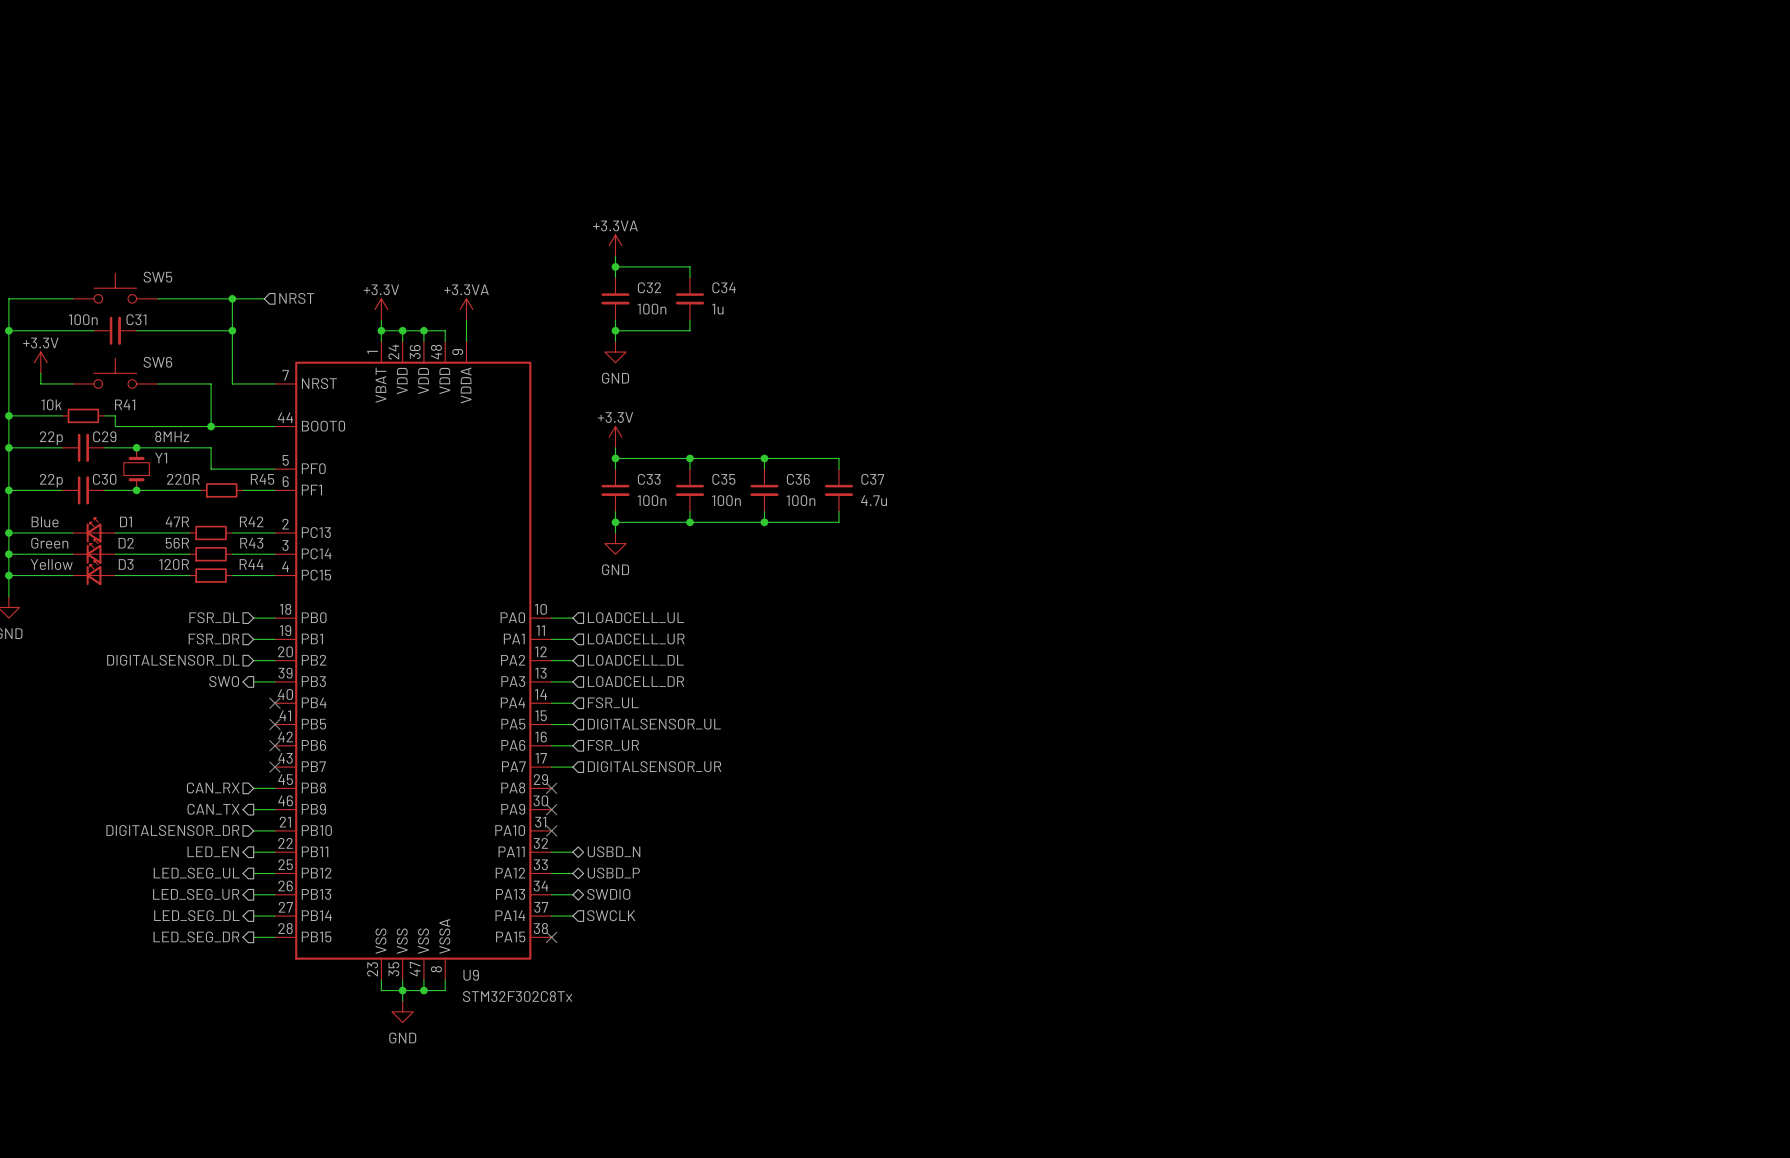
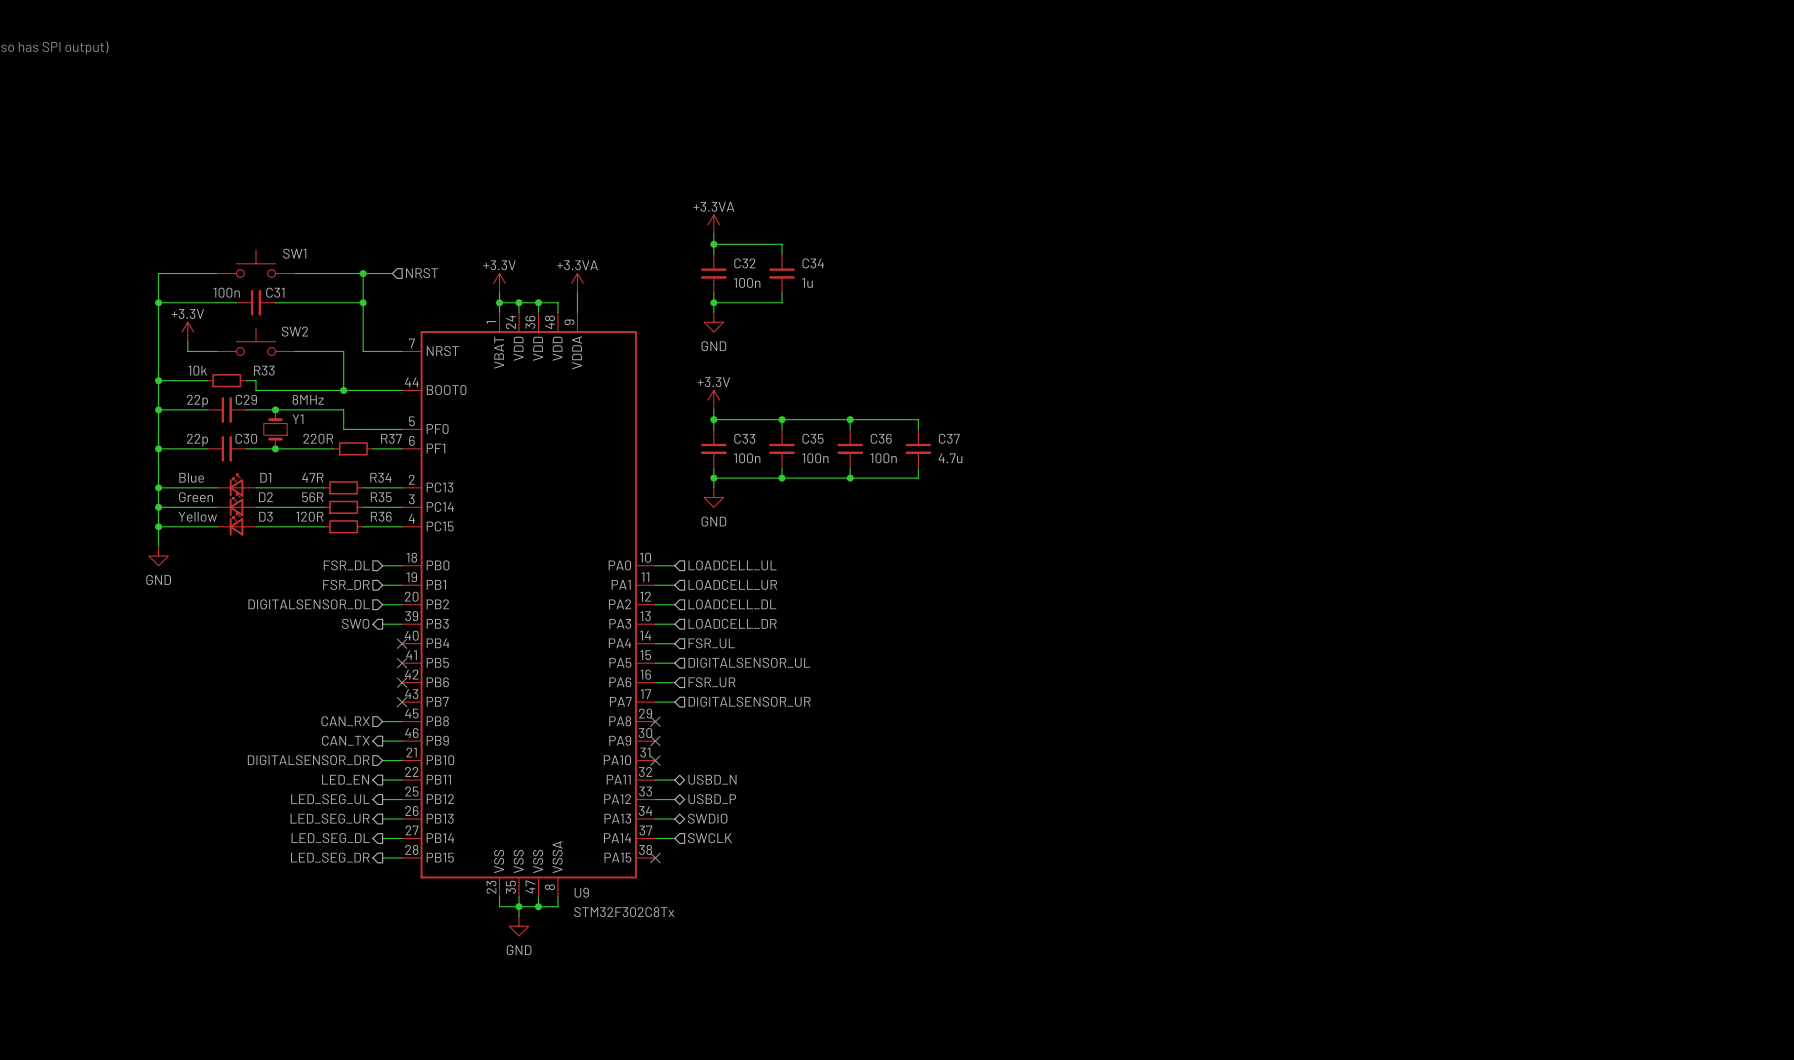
SW5 name: SW5 (157, 277) -> SW1 (294, 253)
SW6 name: SW6 (157, 362) -> SW2 (294, 331)
R41 name: R41 (125, 404) -> R33 (264, 370)
R45 name: R45 (262, 479) -> R37 (391, 438)
R42 name: R42 (251, 521) -> R34 (380, 477)
R43 name: R43 (251, 543) -> R35 (381, 497)
R44 name: R44 (251, 564) -> R36 (381, 516)

